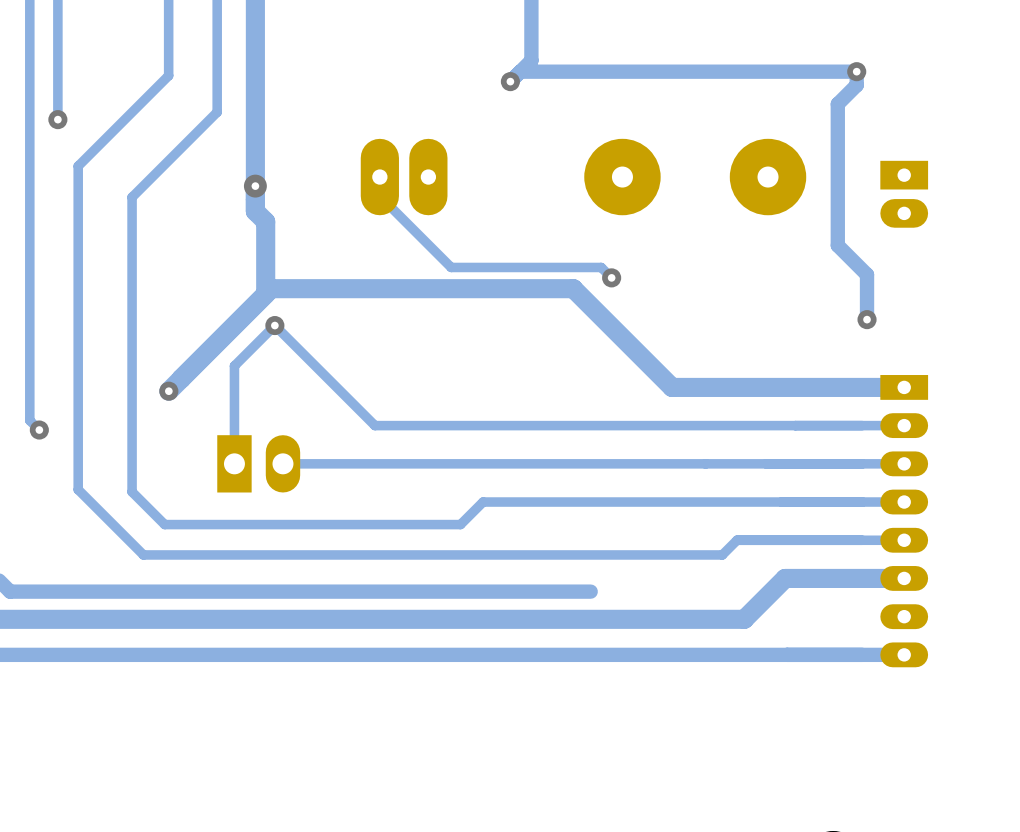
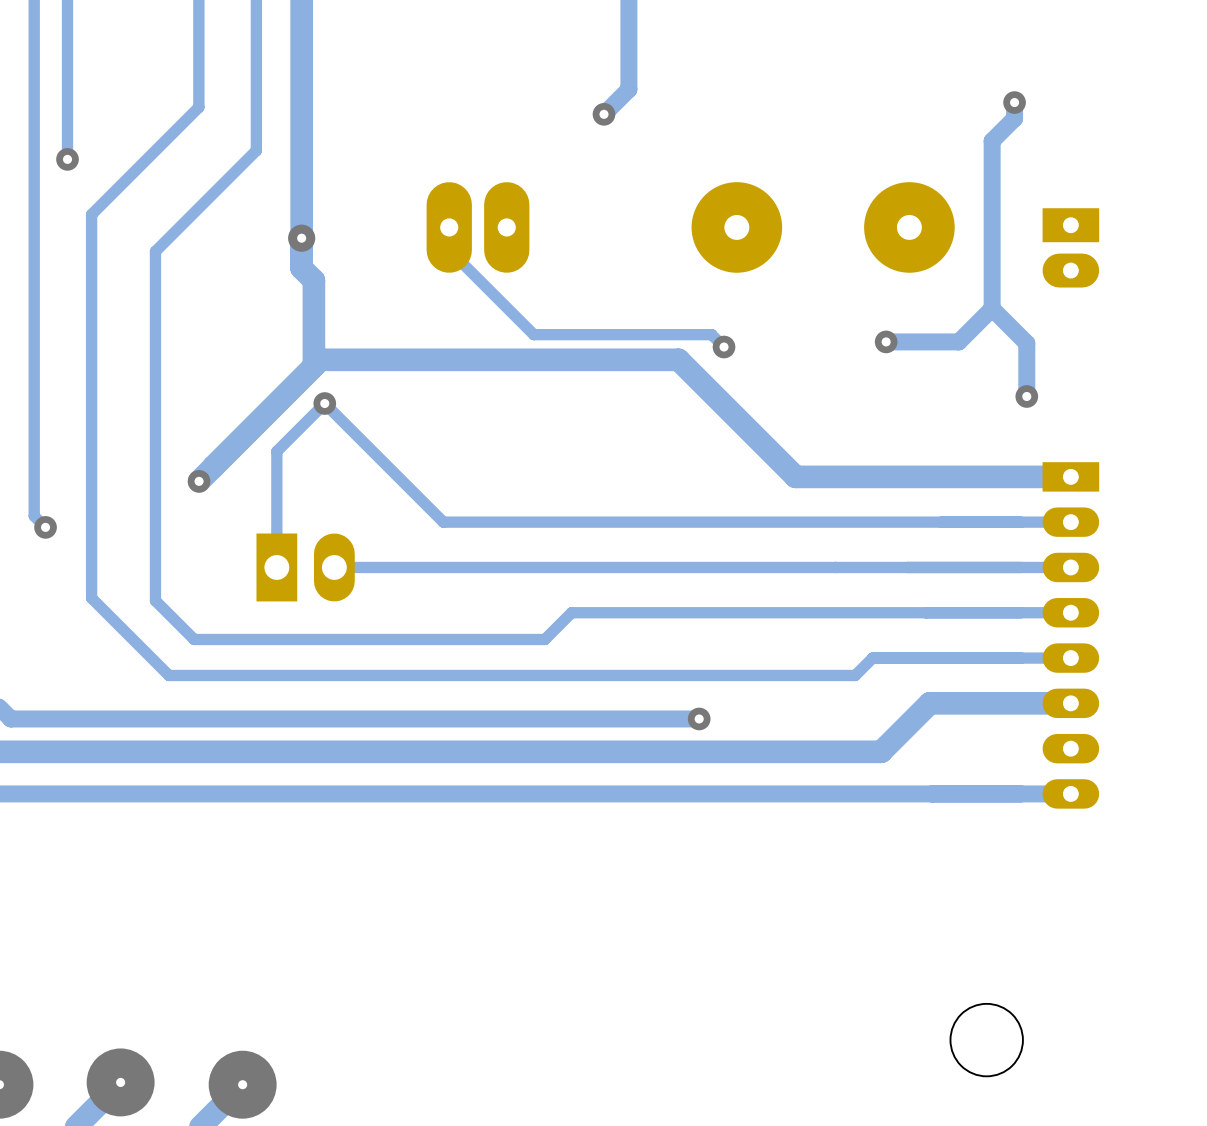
track: (856, 71) (520, 71) -> none
track: none -> (992, 308) (958, 341) (886, 341)
via: none -> (886, 341)
via: none -> (699, 718)

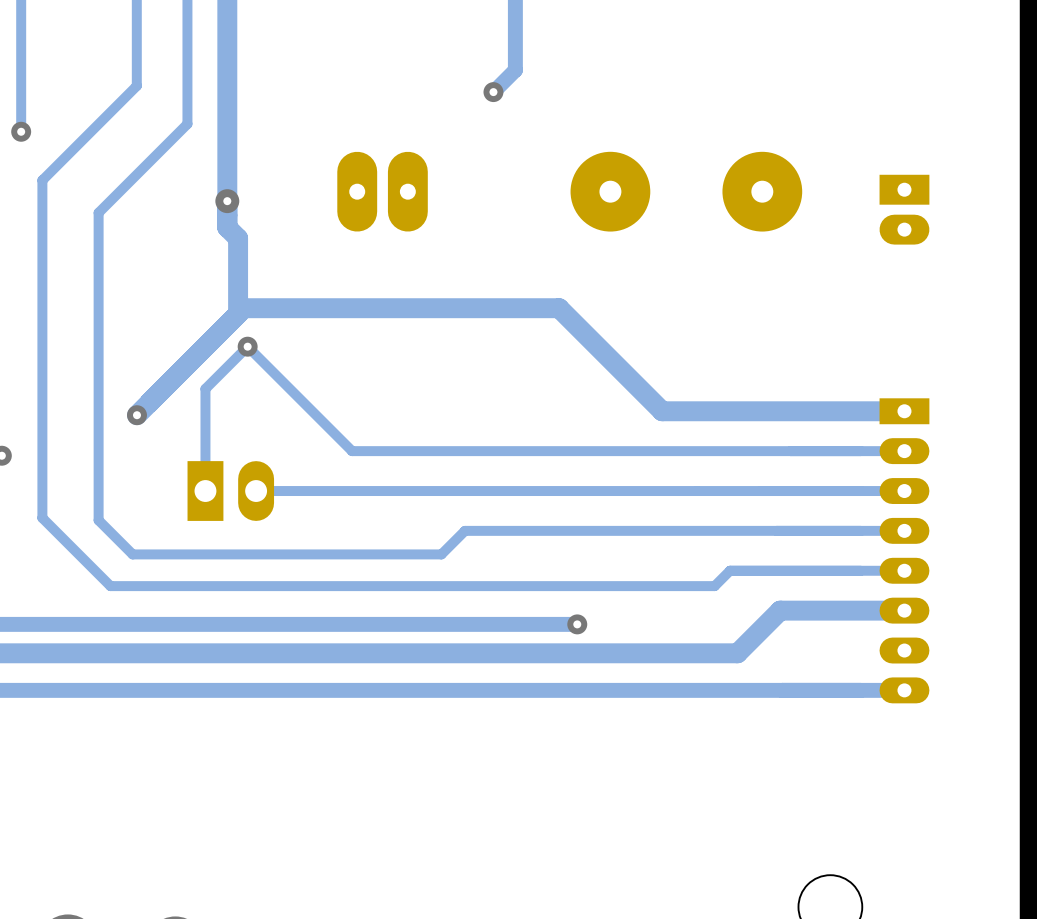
track: (1014, 102) (1014, 118) (992, 140) (992, 308) -> none
via: (1014, 102) -> none
track: (449, 227) (449, 250) (533, 334) (711, 334) (724, 347) -> none
track: (992, 308) (958, 341) (886, 341) -> none
track: (992, 308) (1026, 343) (1026, 396) -> none
via: (886, 341) -> none
via: (724, 347) -> none
via: (1026, 396) -> none

